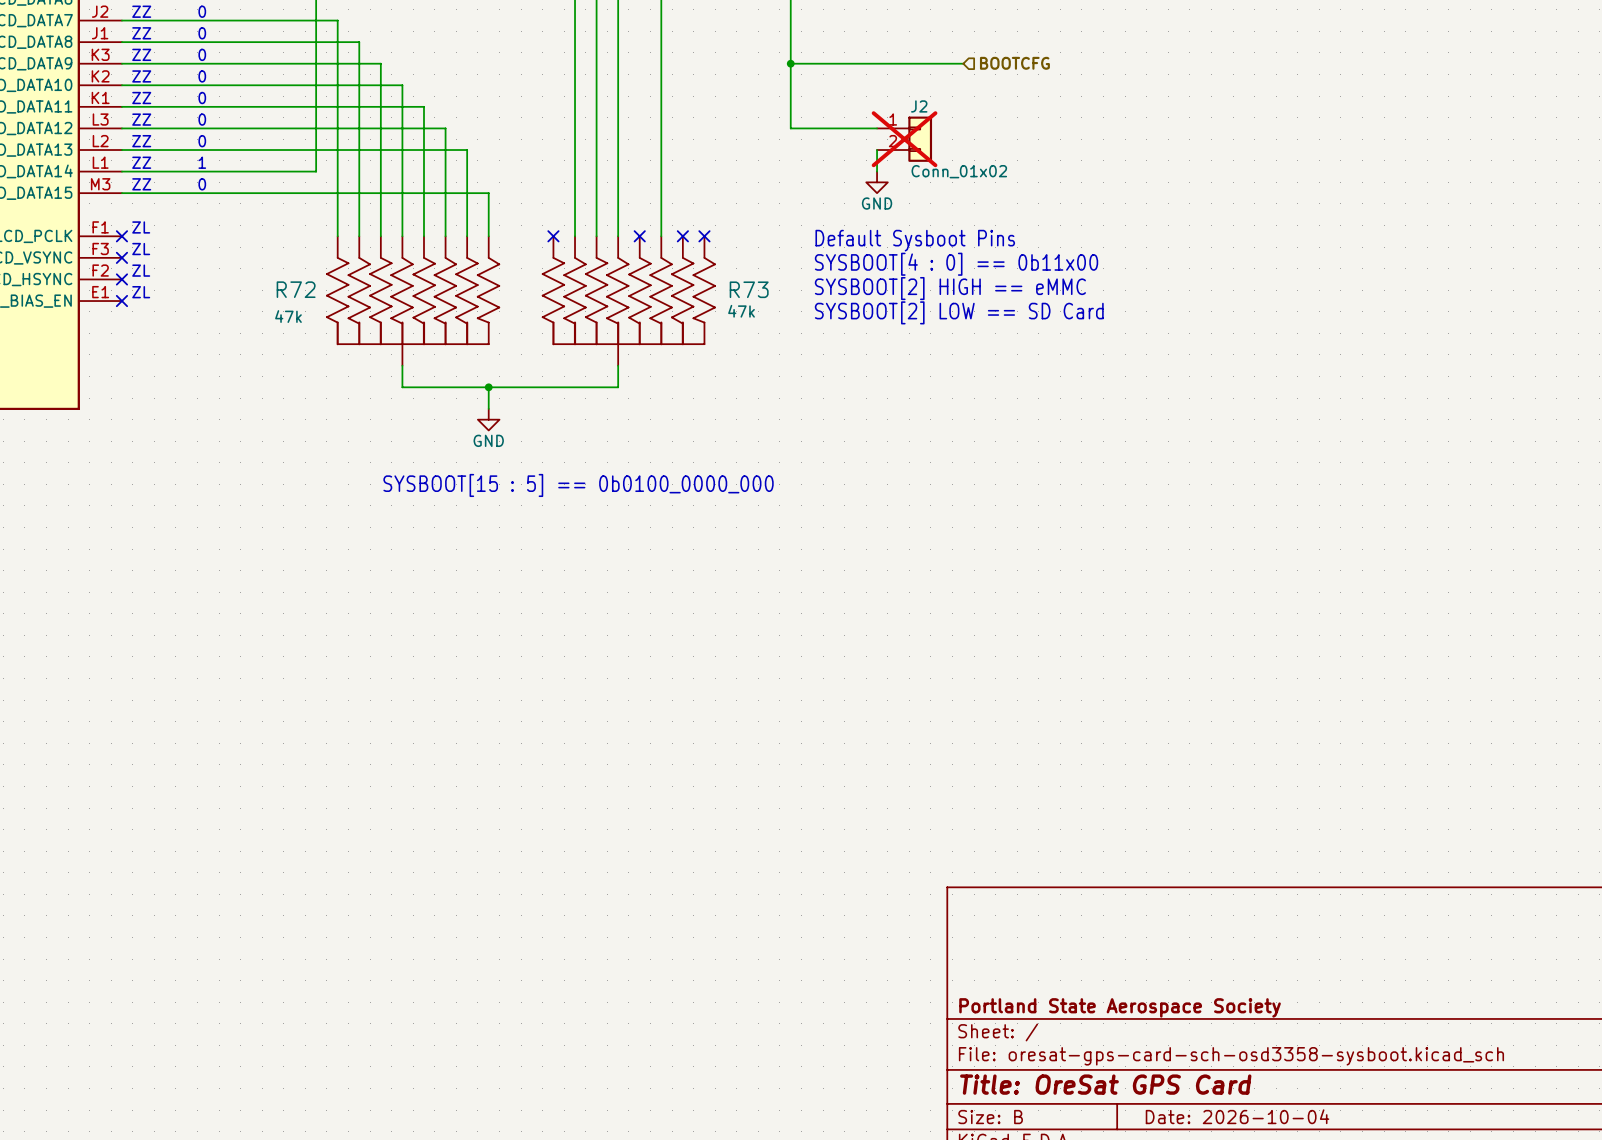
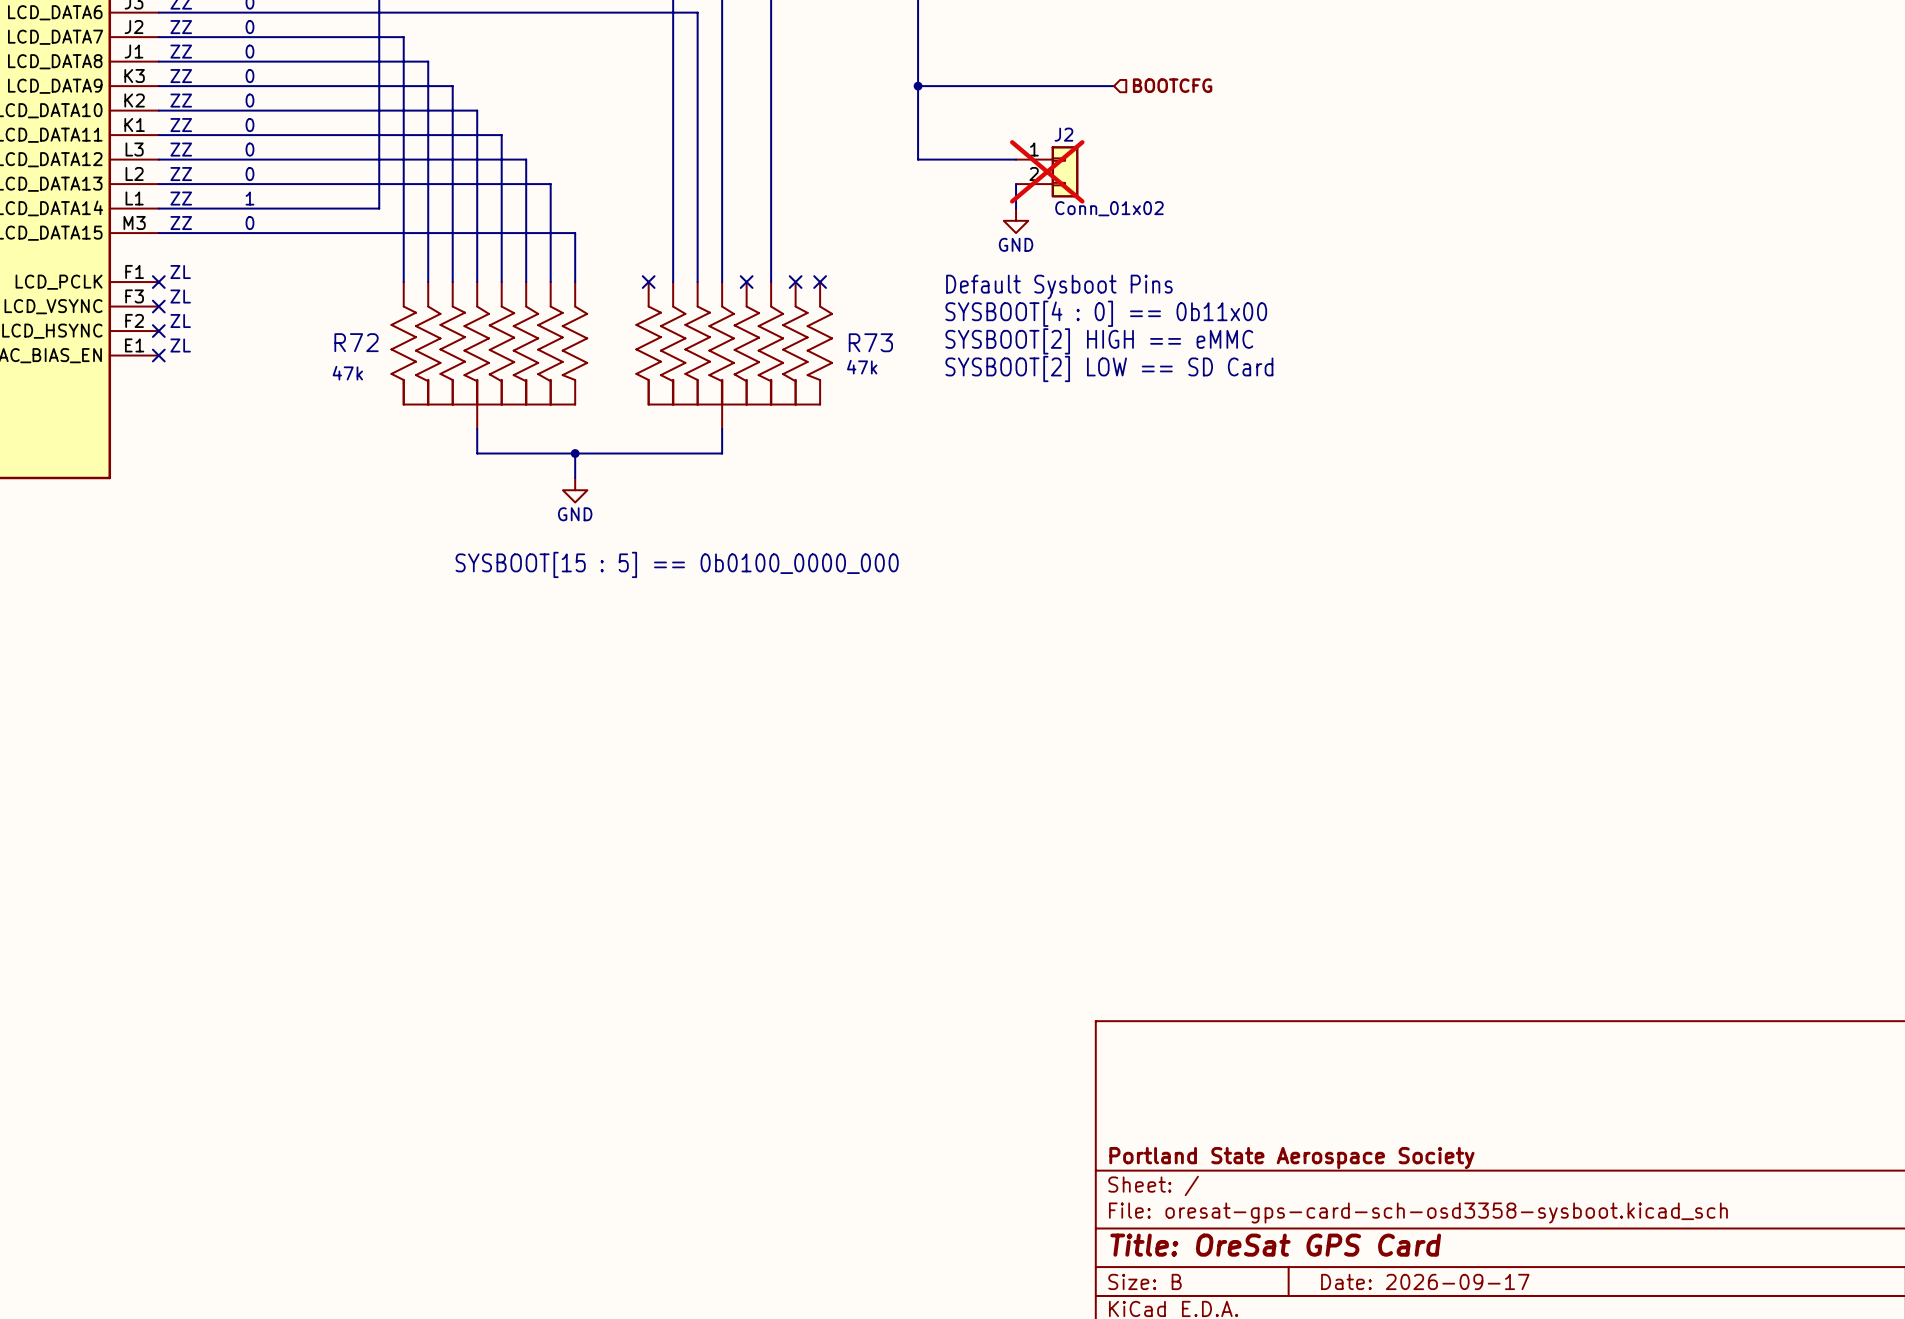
title block: Date: 2026-10-04 (1237, 1116) -> Date: 2026-09-17 (1425, 1281)

